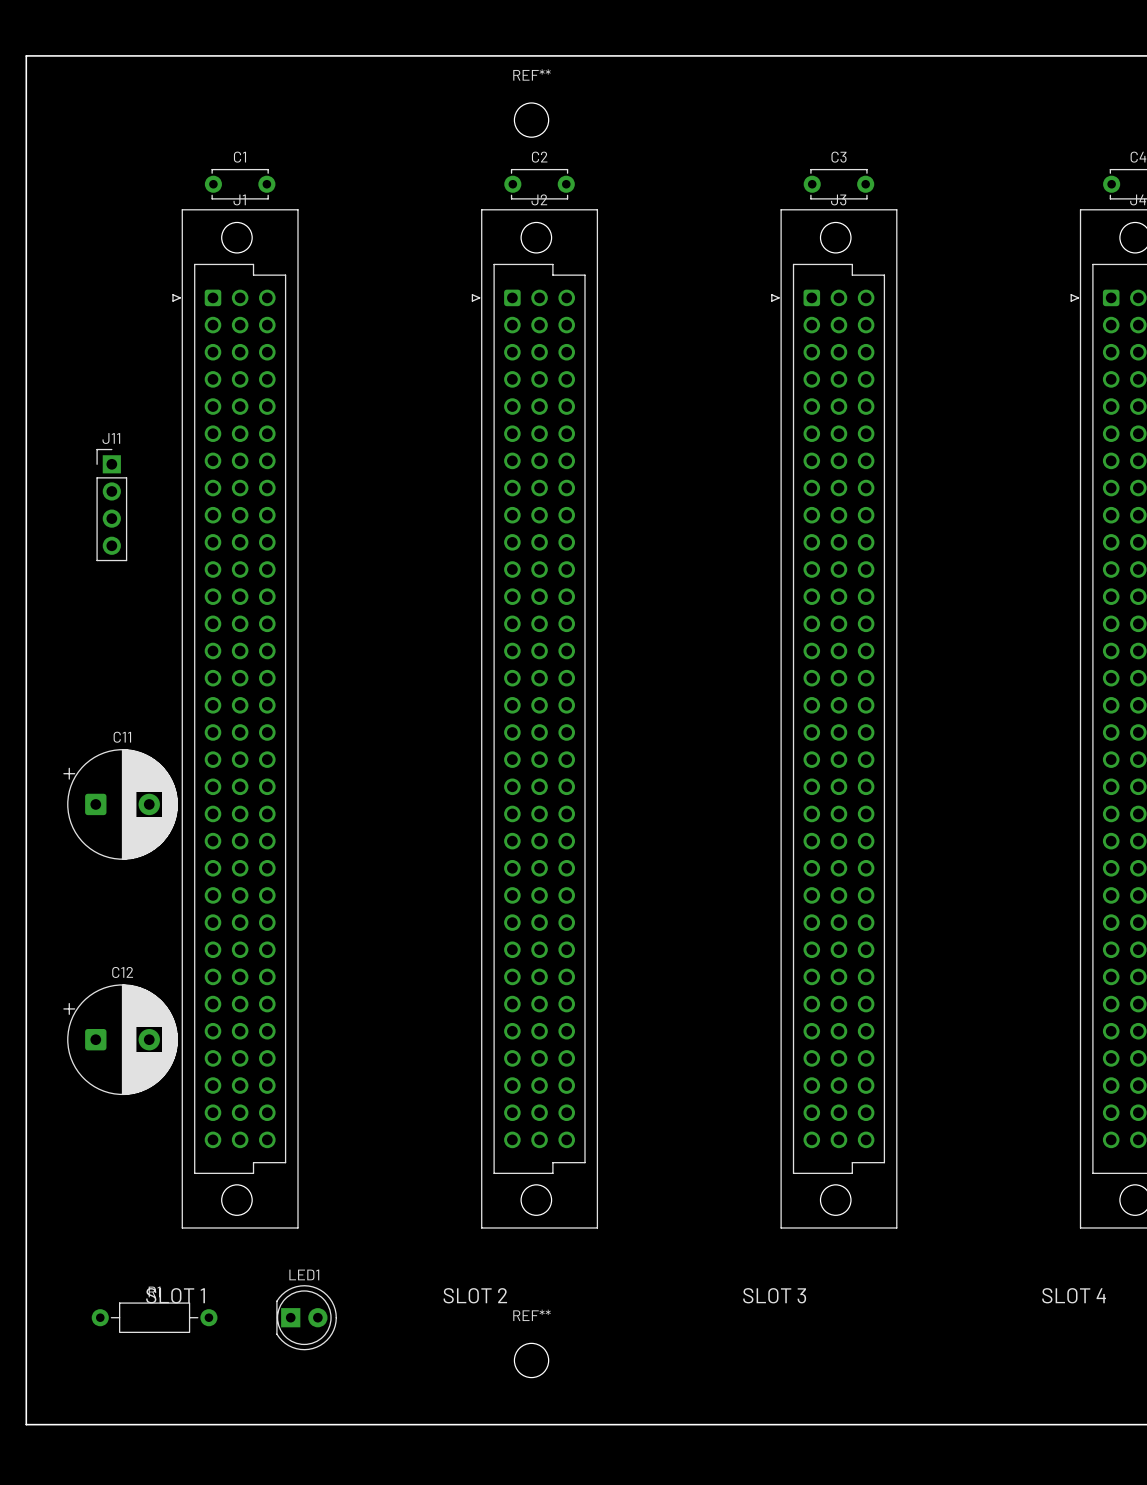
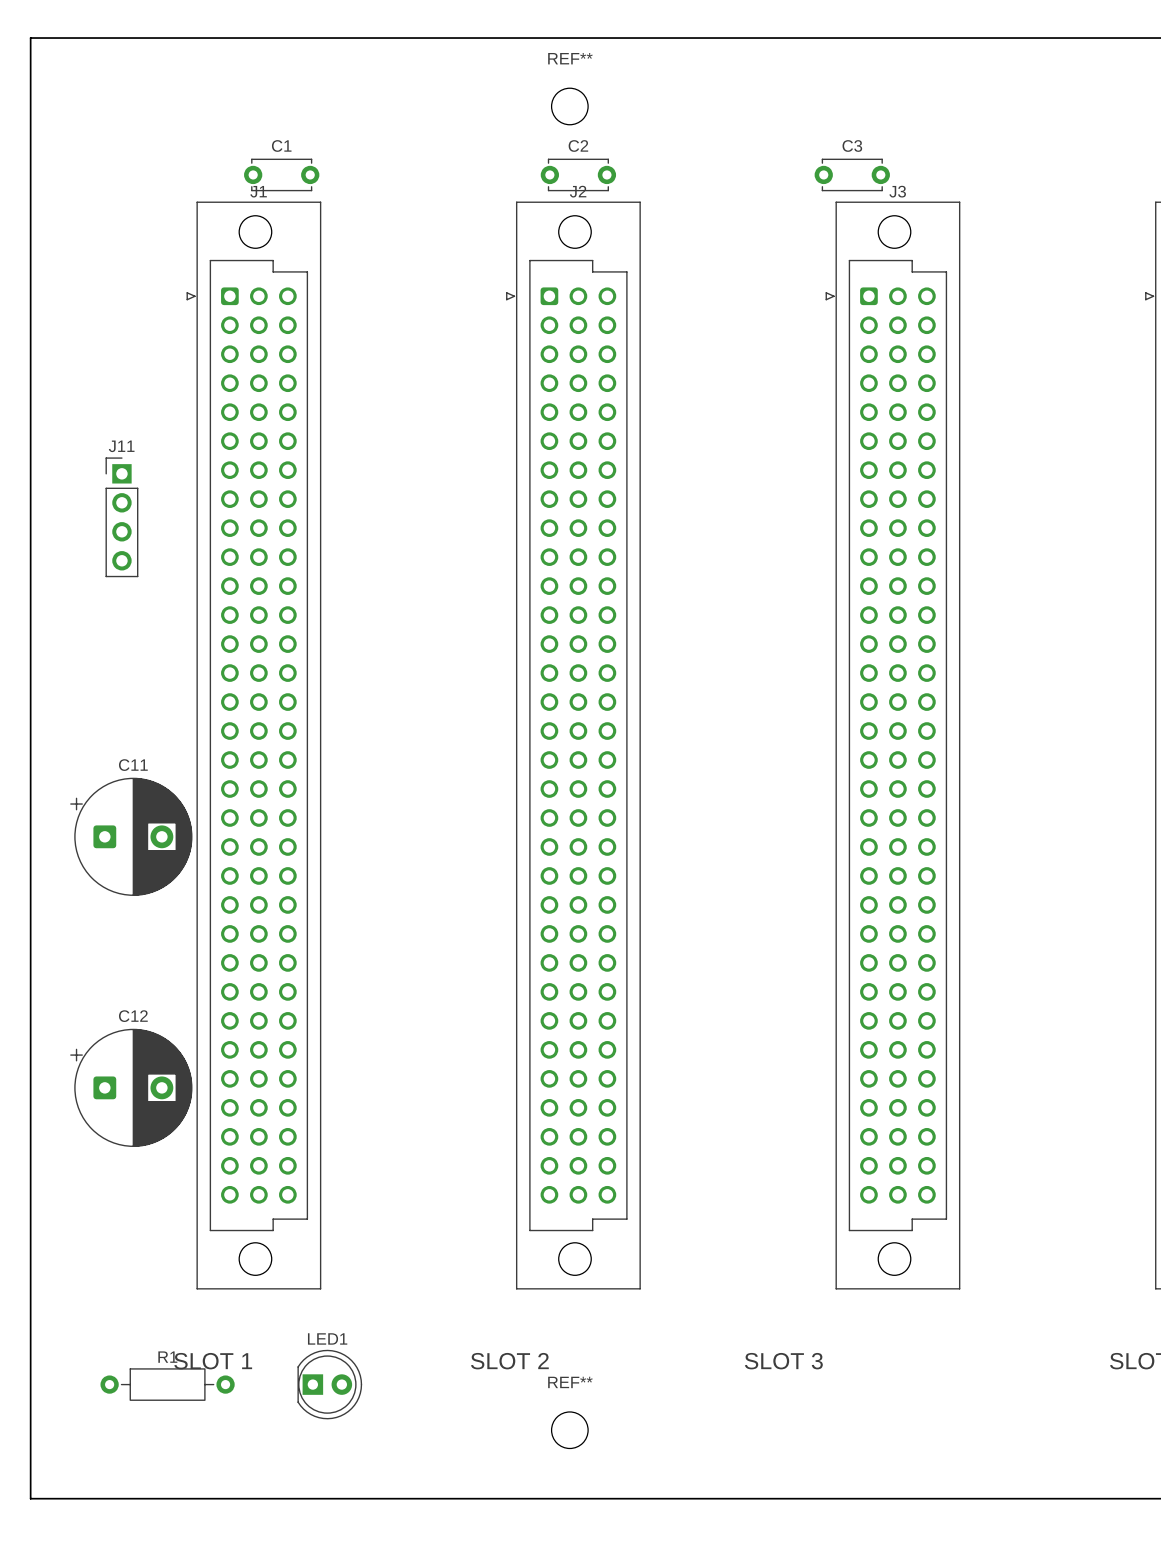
C1 position: (240, 184) -> (281, 174)
C3 position: (838, 184) -> (852, 174)
text position: SLOT 1 (175, 1295) -> SLOT 1 (213, 1361)
text position: SLOT 3 (774, 1295) -> SLOT 3 (783, 1361)

